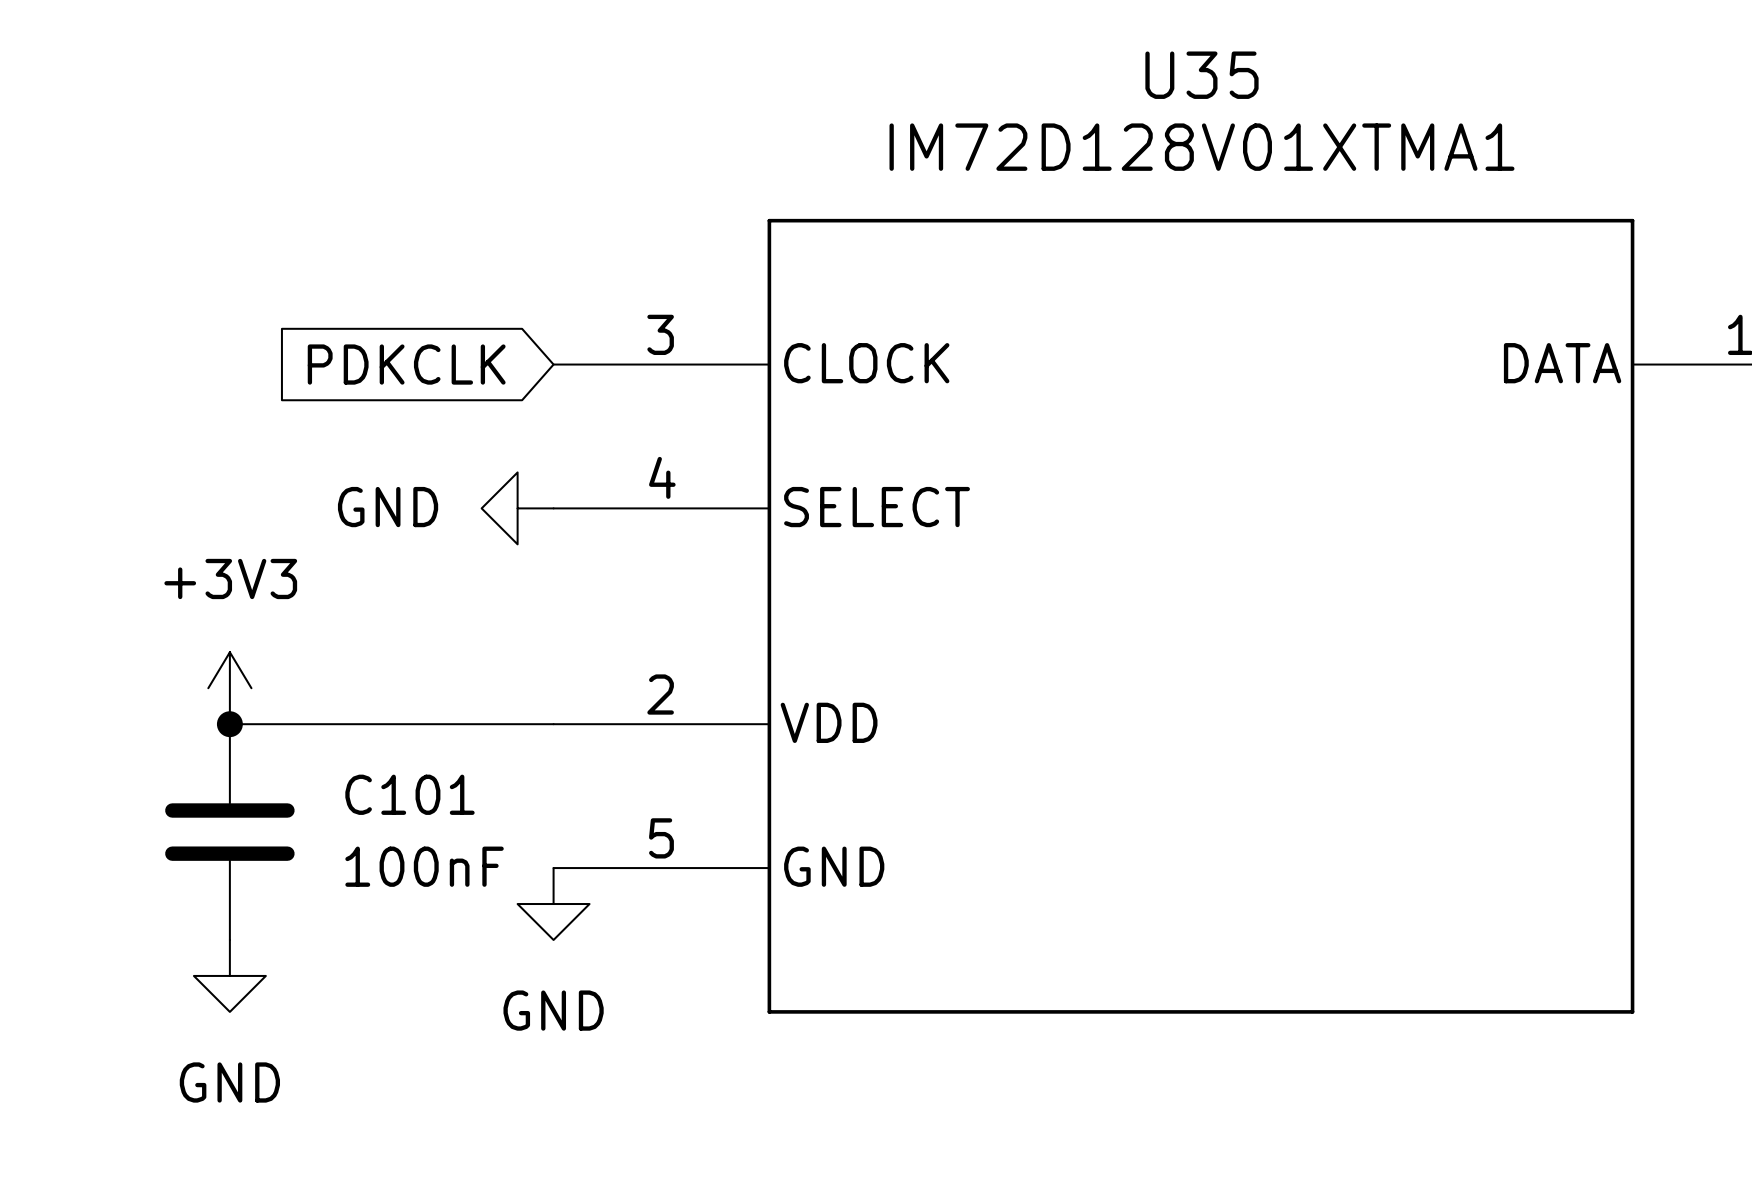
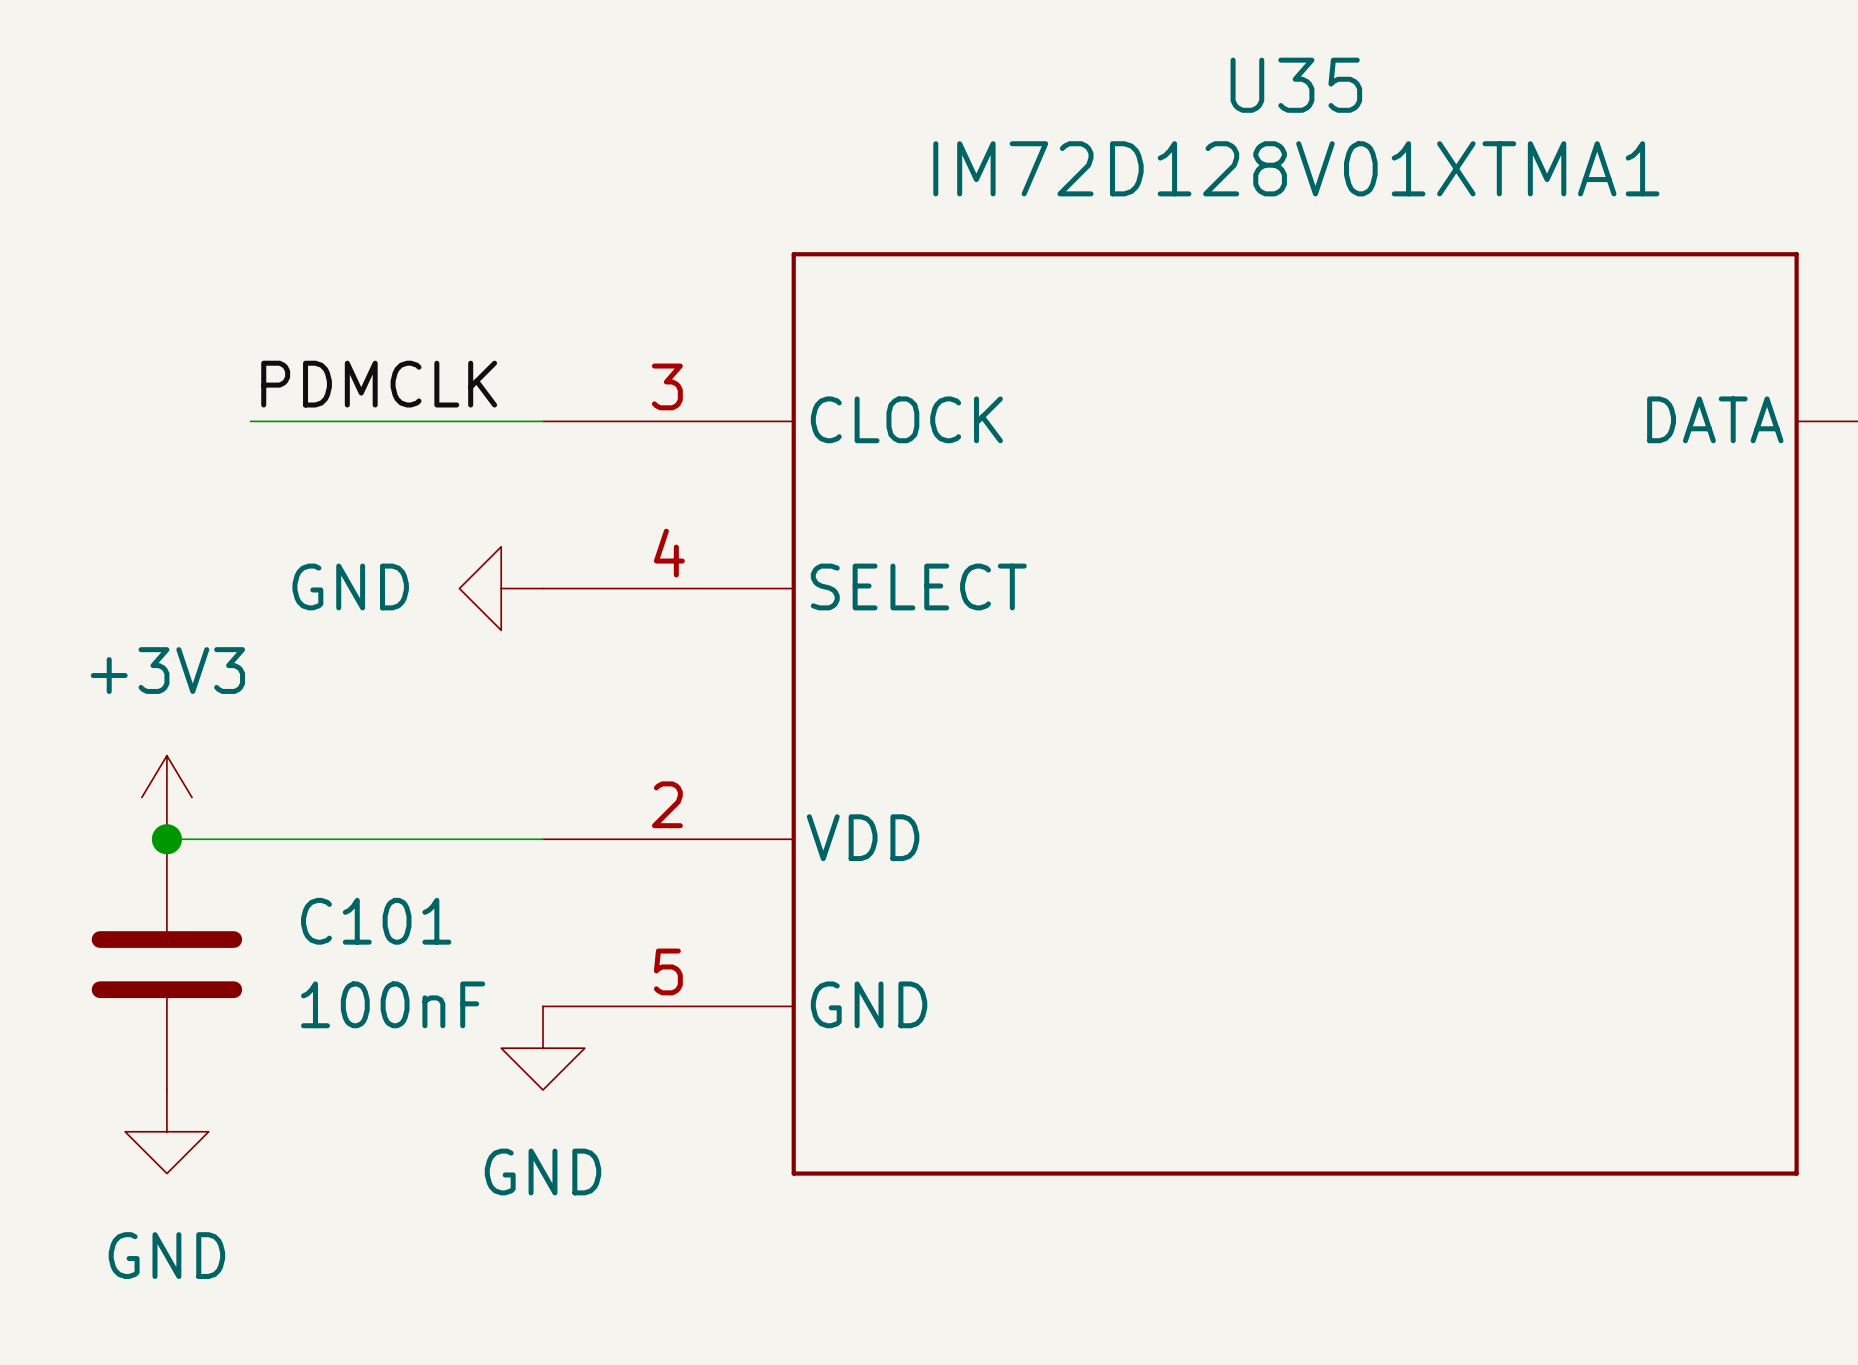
label: none -> PDMCLK (379, 384)
wire: none -> (250, 421) (543, 421)
global label: PDKCLK (406, 364) -> none

